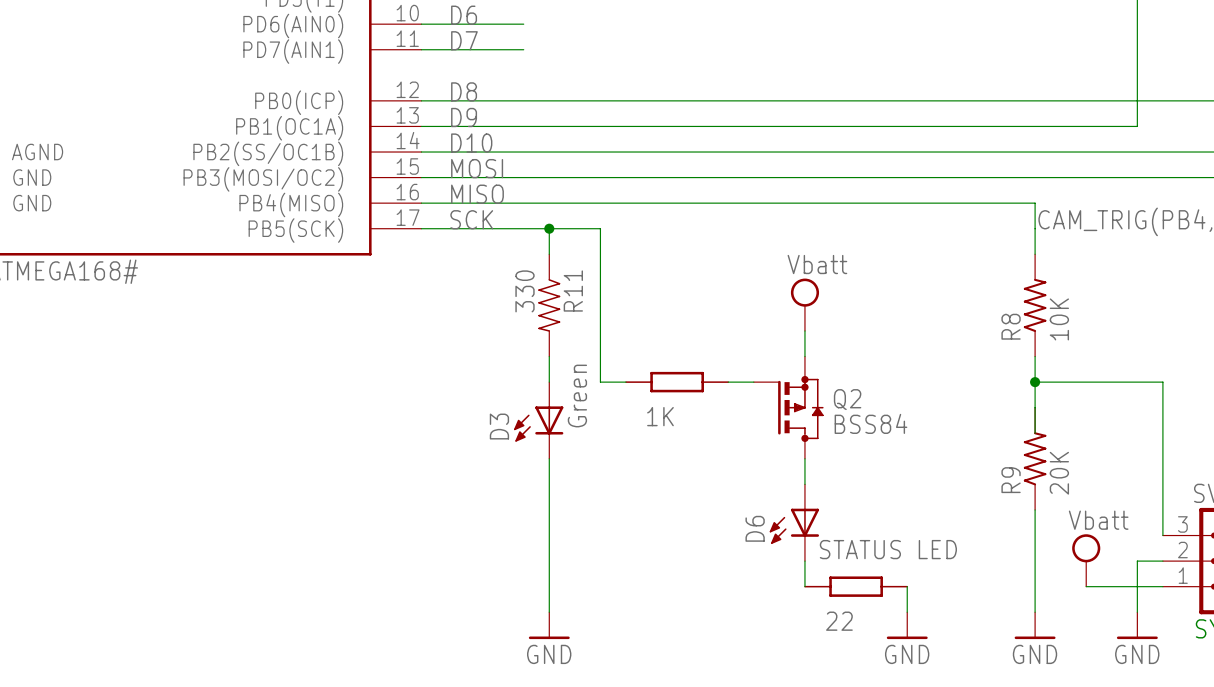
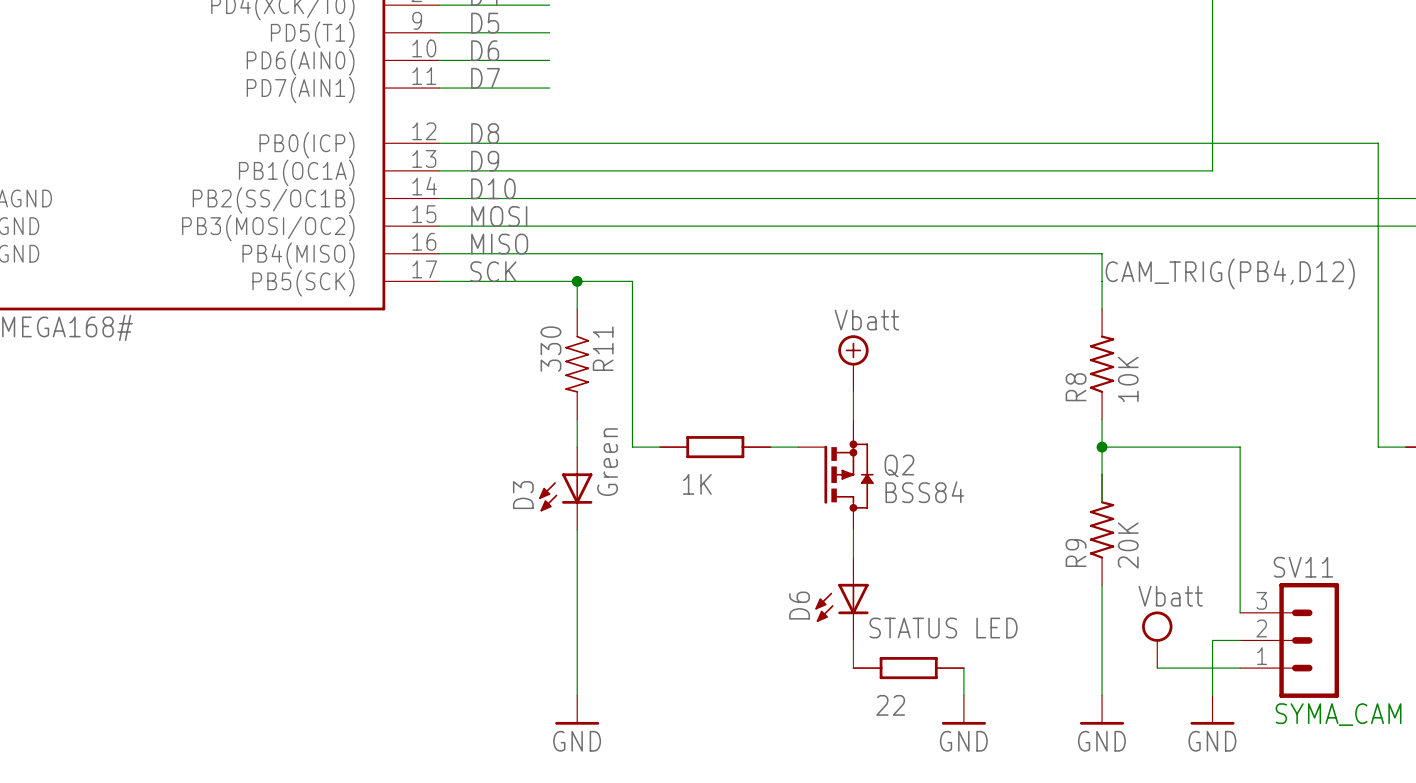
power symbol shape: [790, 278, 820, 331] -> [838, 335, 869, 392]

